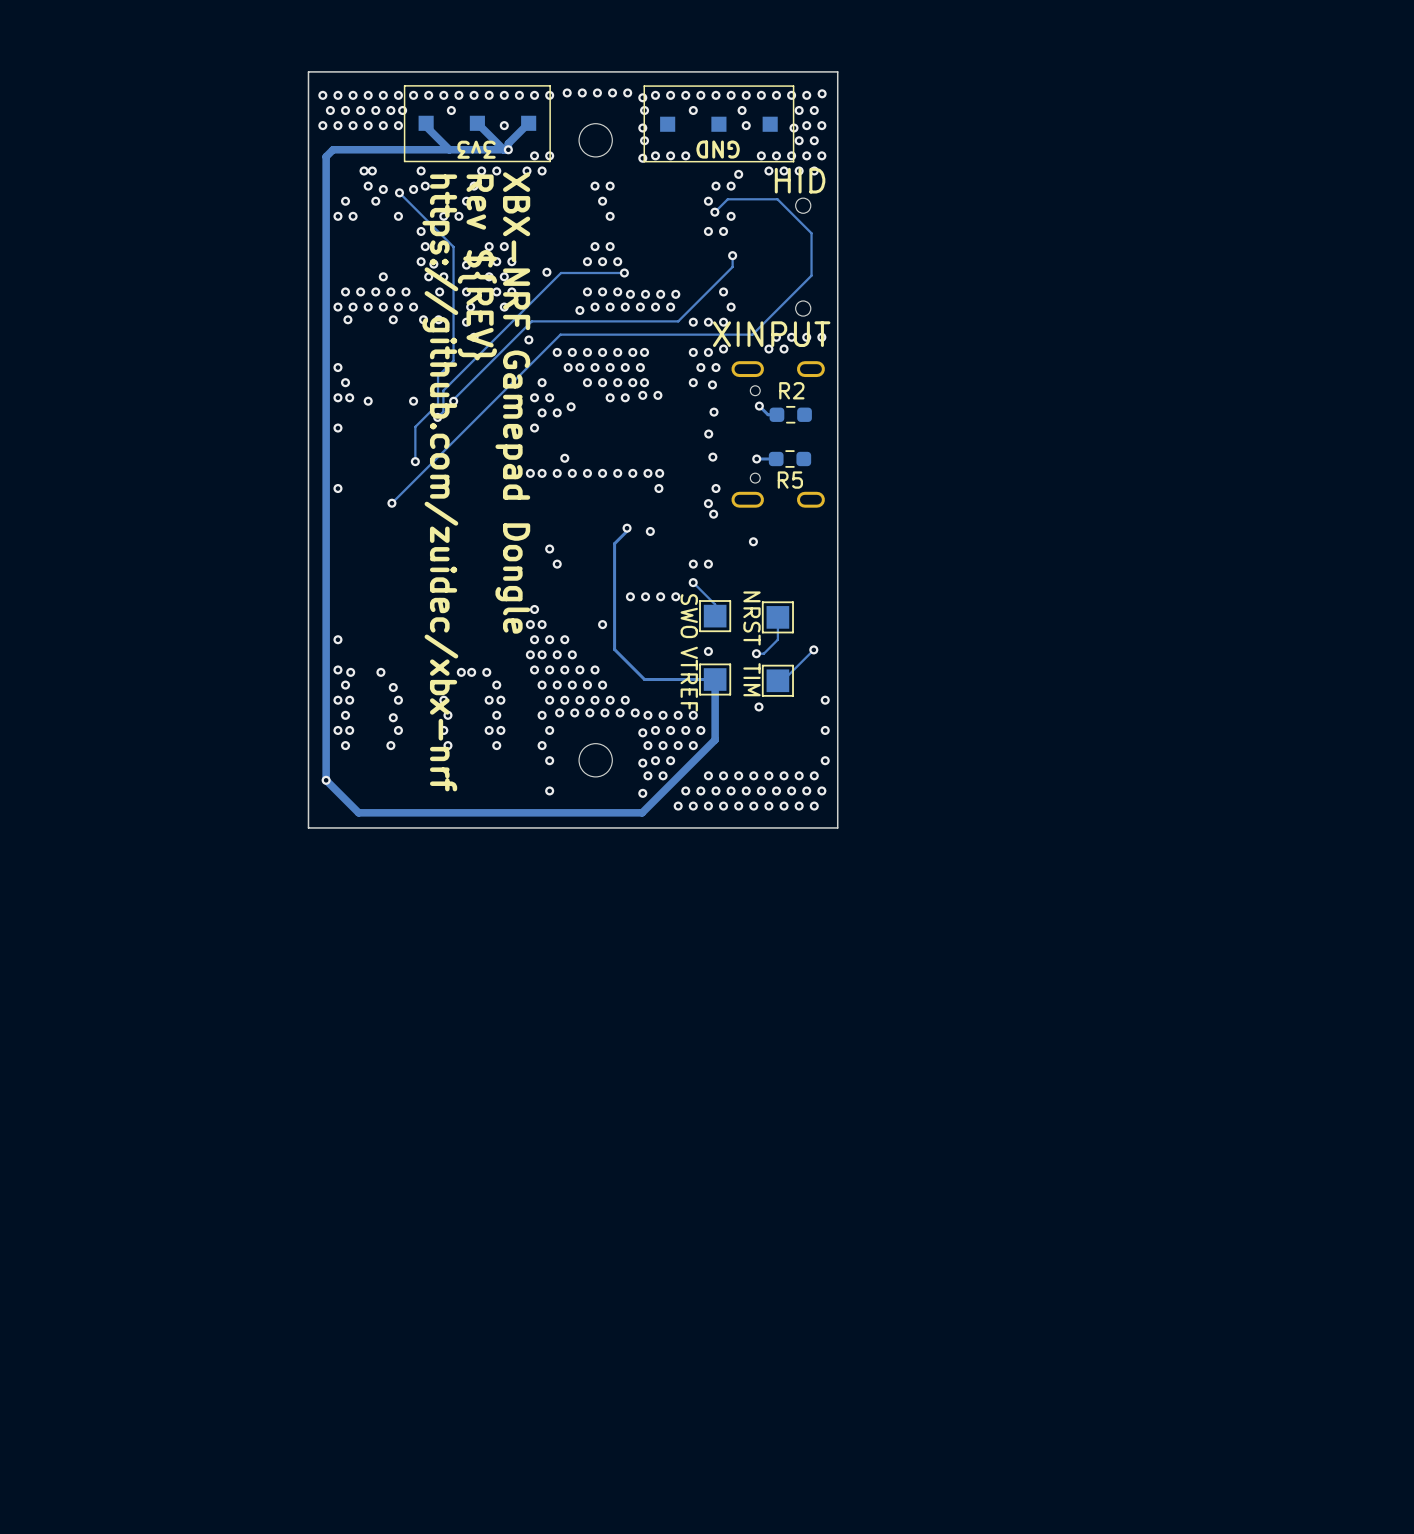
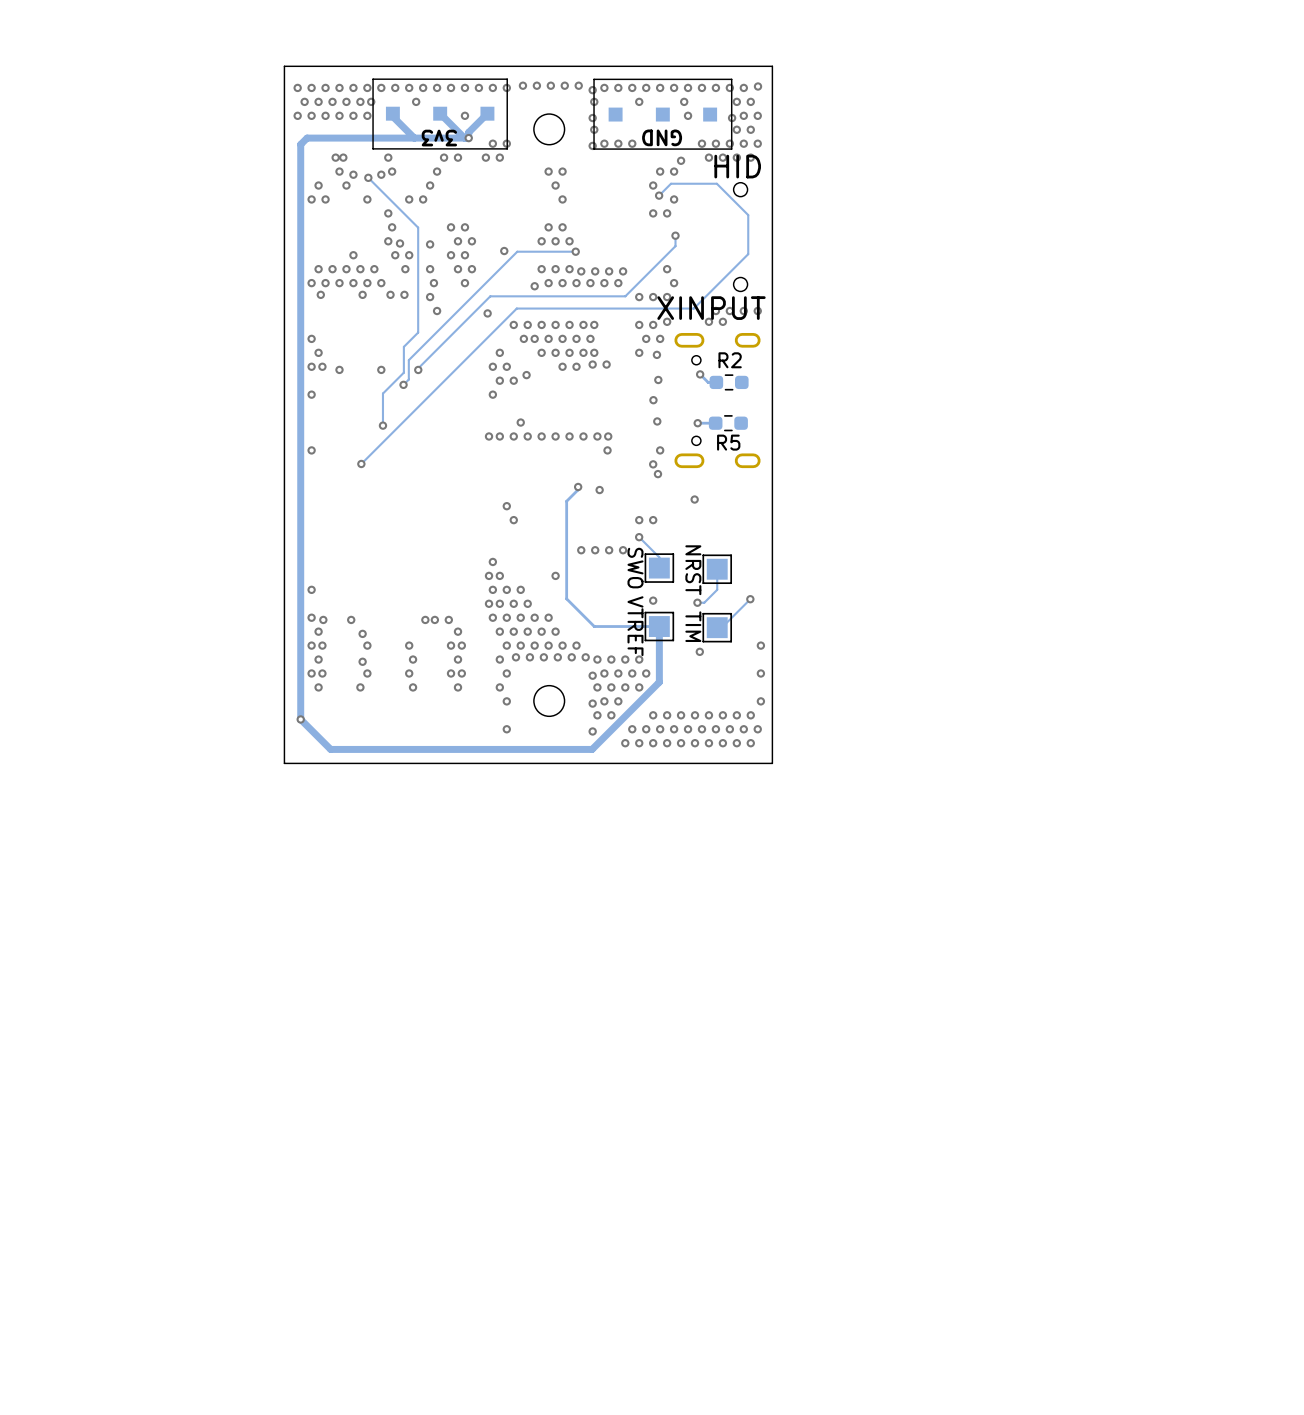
text: Rev ${REV} (477, 267) -> none
text: XBX-NRF Gamepad Dongle (512, 402) -> none
text: https://github.com/zuidec/xbx-nrf (440, 482) -> none

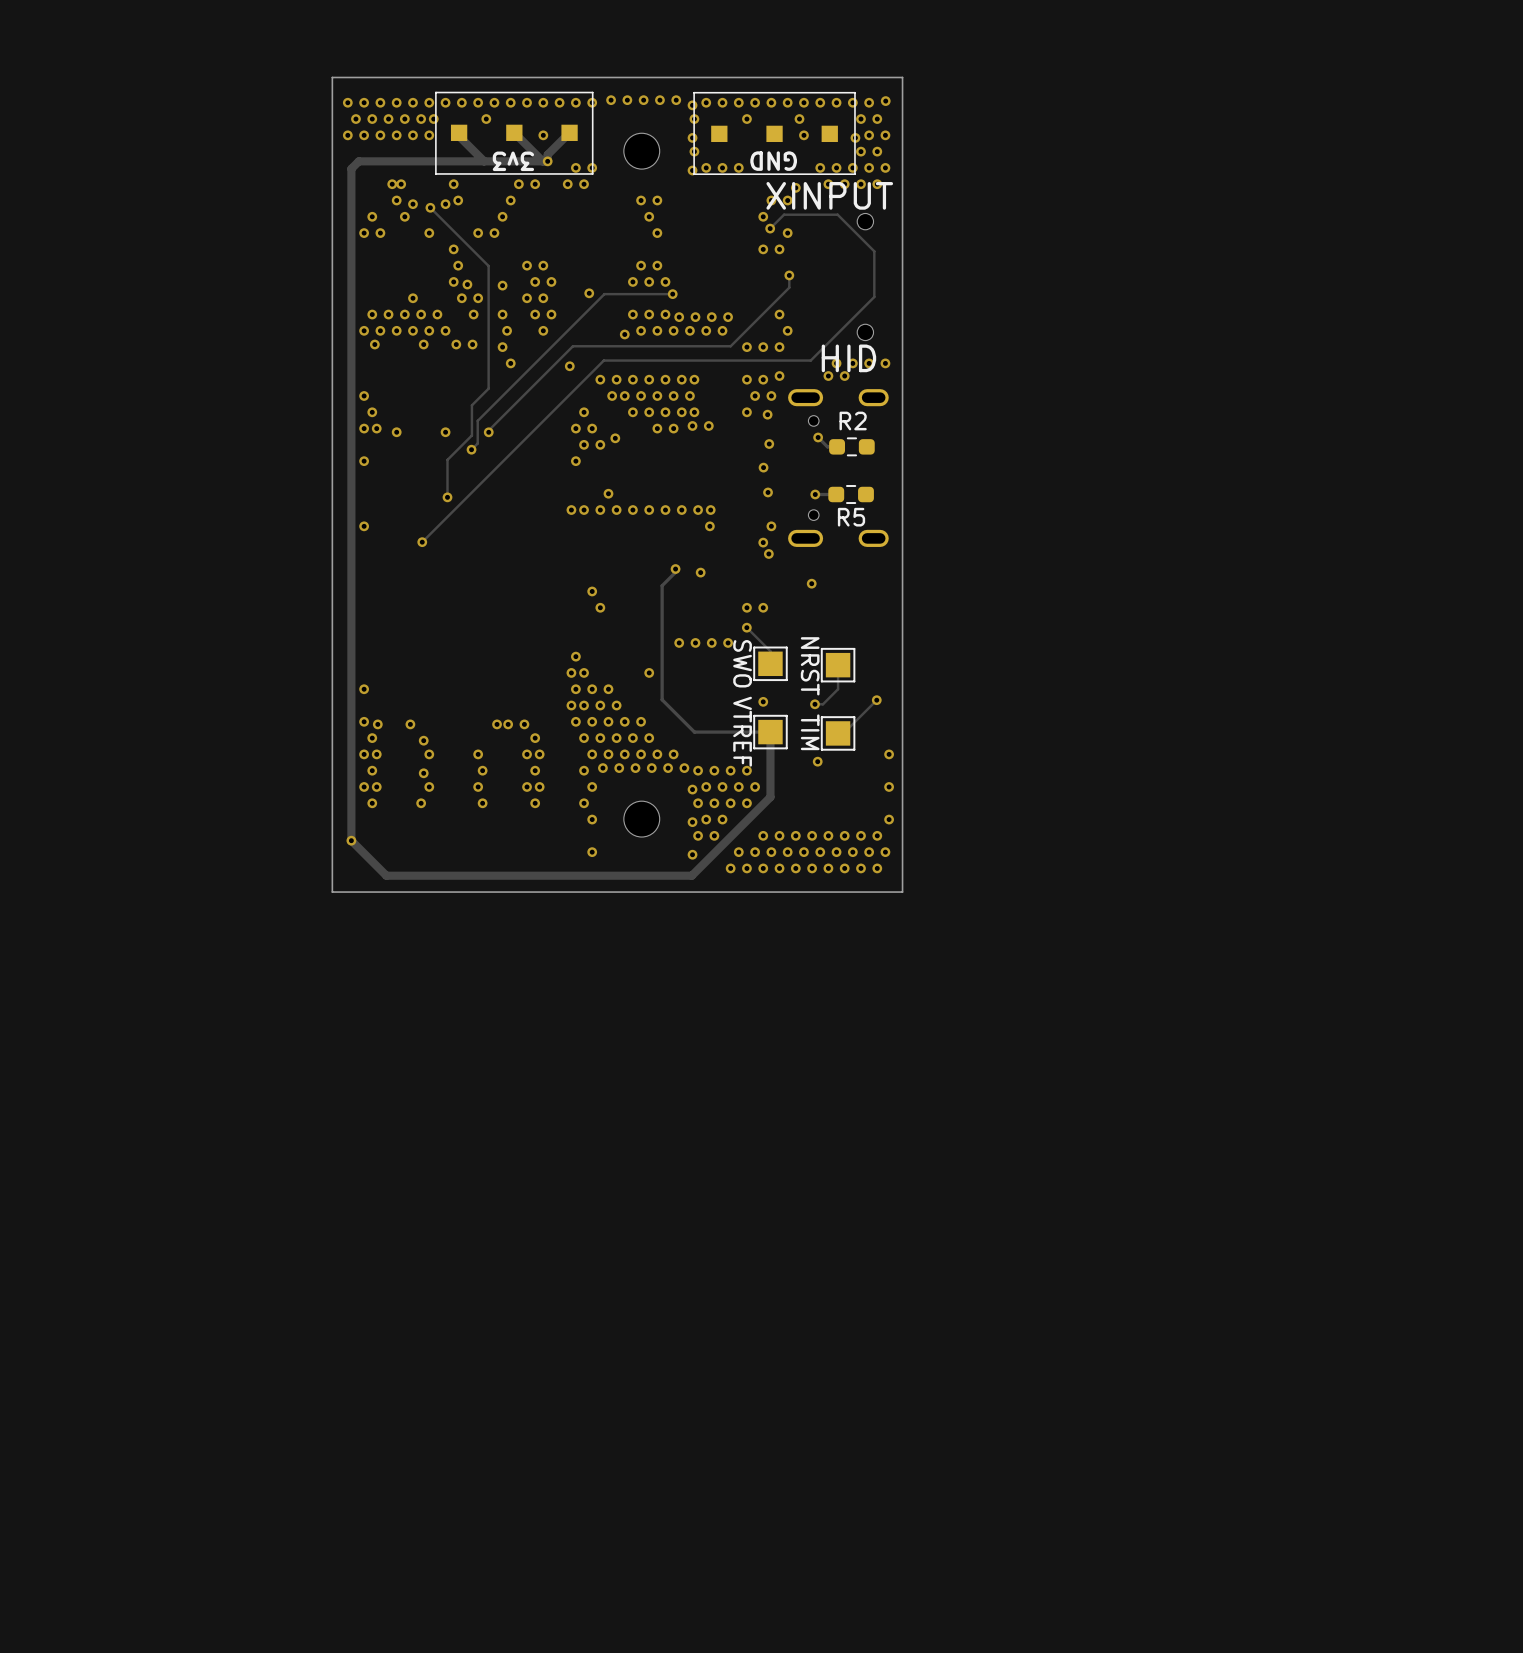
text position: HID (737, 166) -> HID (848, 358)
text position: XINPUT (711, 308) -> XINPUT (829, 195)

